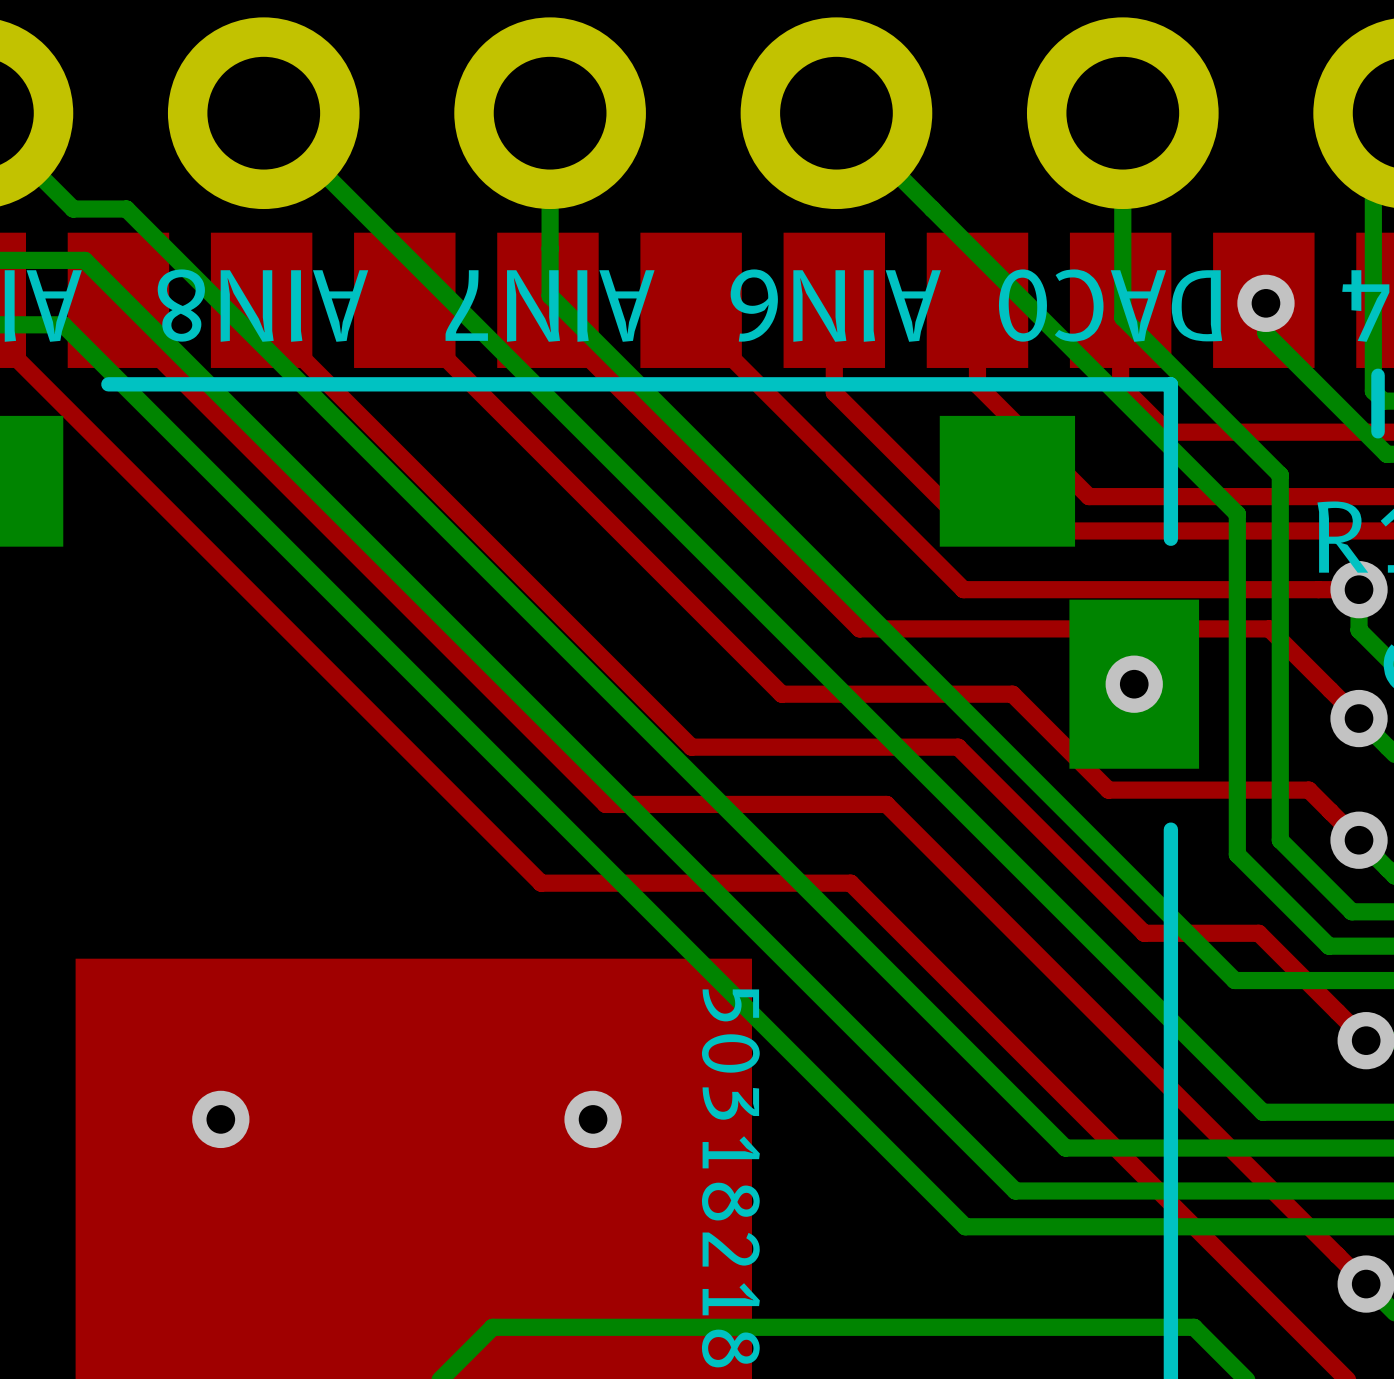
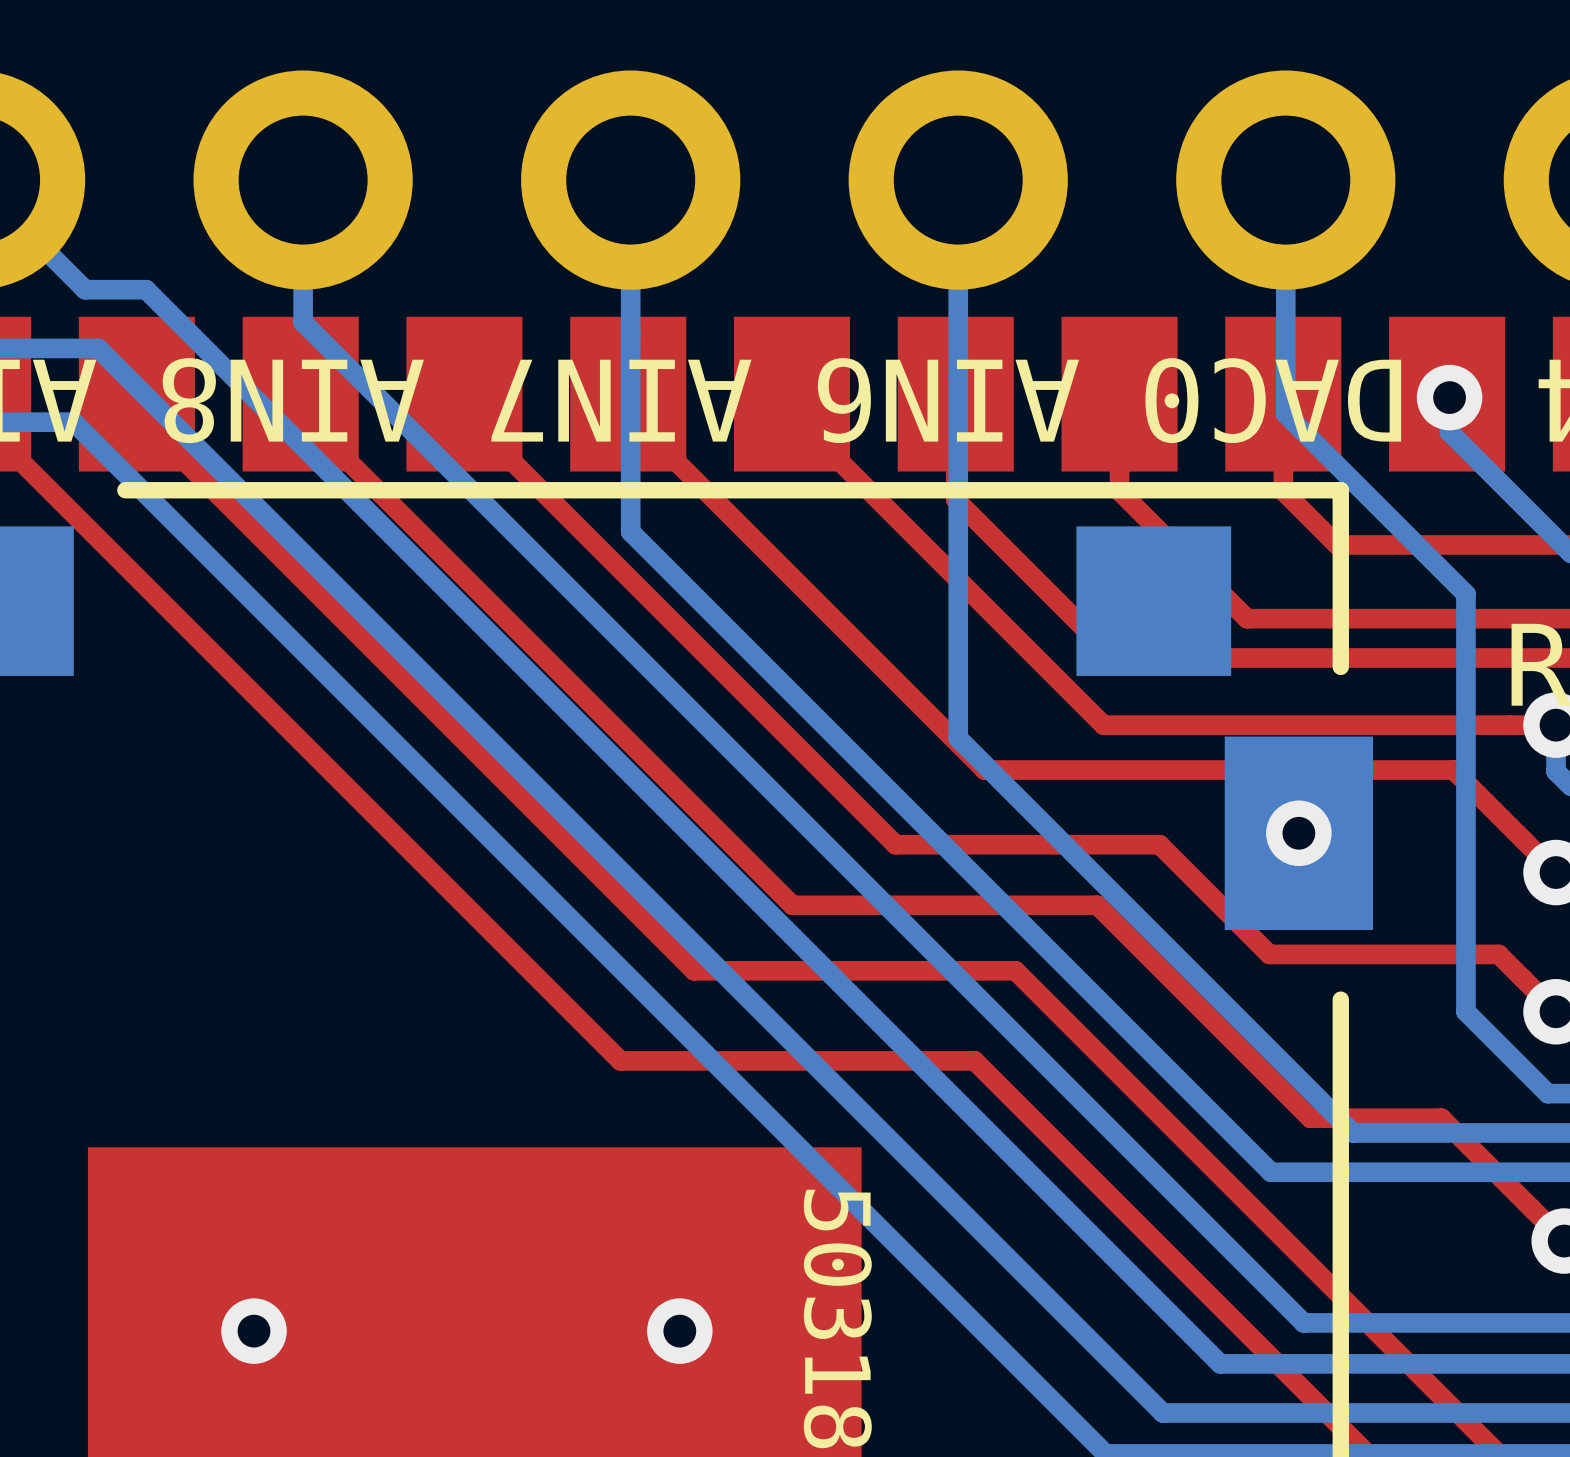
bottom track: (263, 113) (1262, 1112) -> (303, 180) (303, 322) (1303, 1322) (1445, 1322)
bottom track: (836, 113) (1237, 514) (1237, 854) (1328, 946) -> (958, 180) (958, 738) (1352, 1132) (1521, 1132)
bottom track: (550, 295) (1234, 980) -> (630, 389) (630, 531) (1271, 1172) (1413, 1172)

